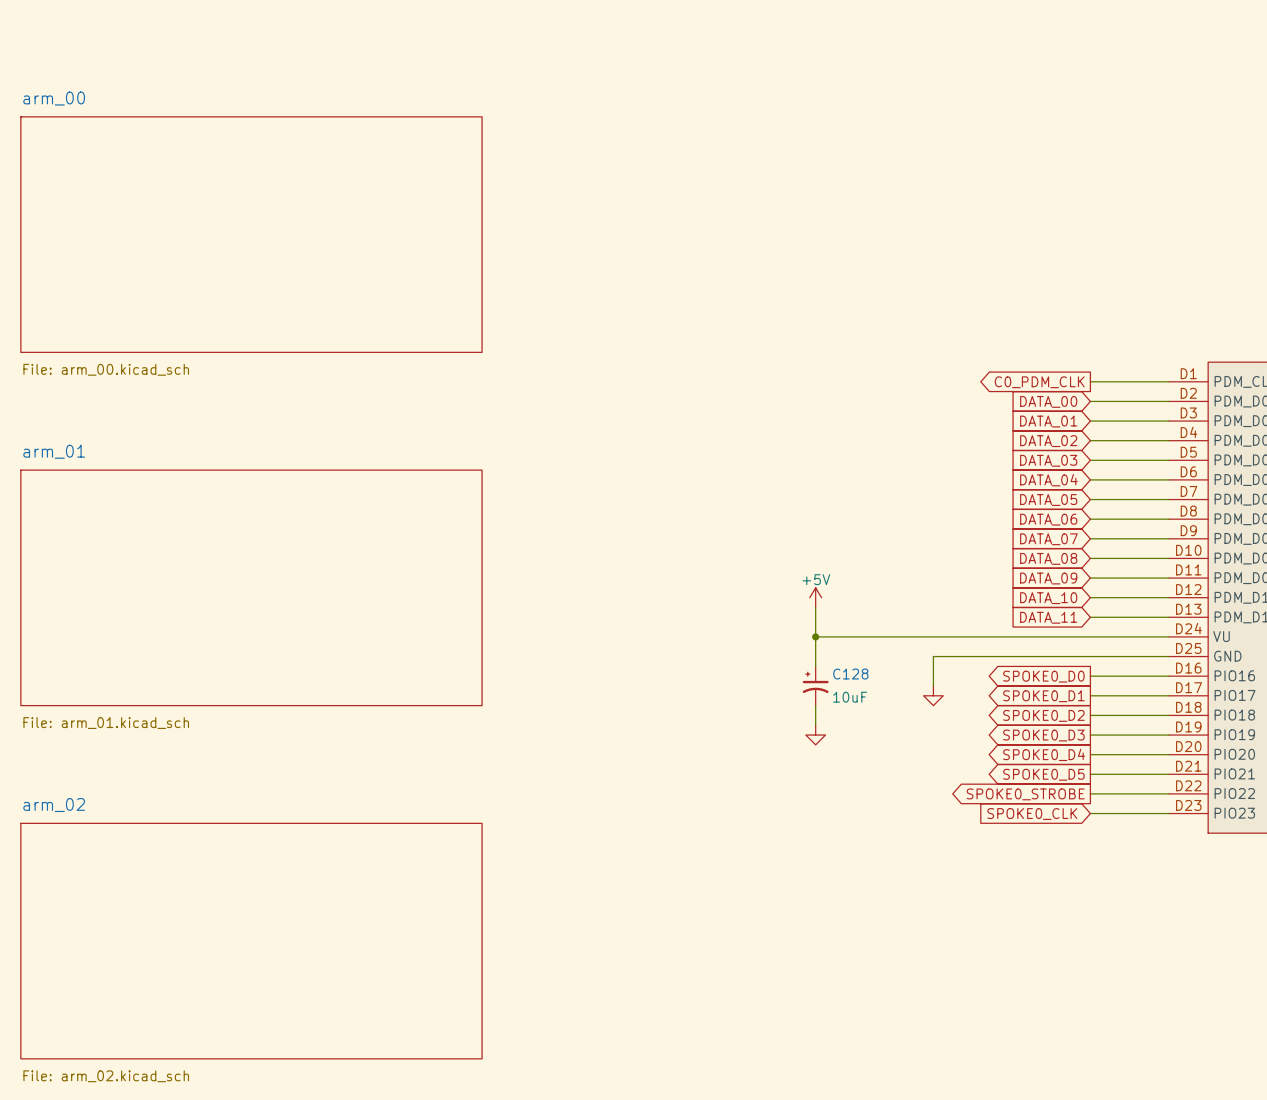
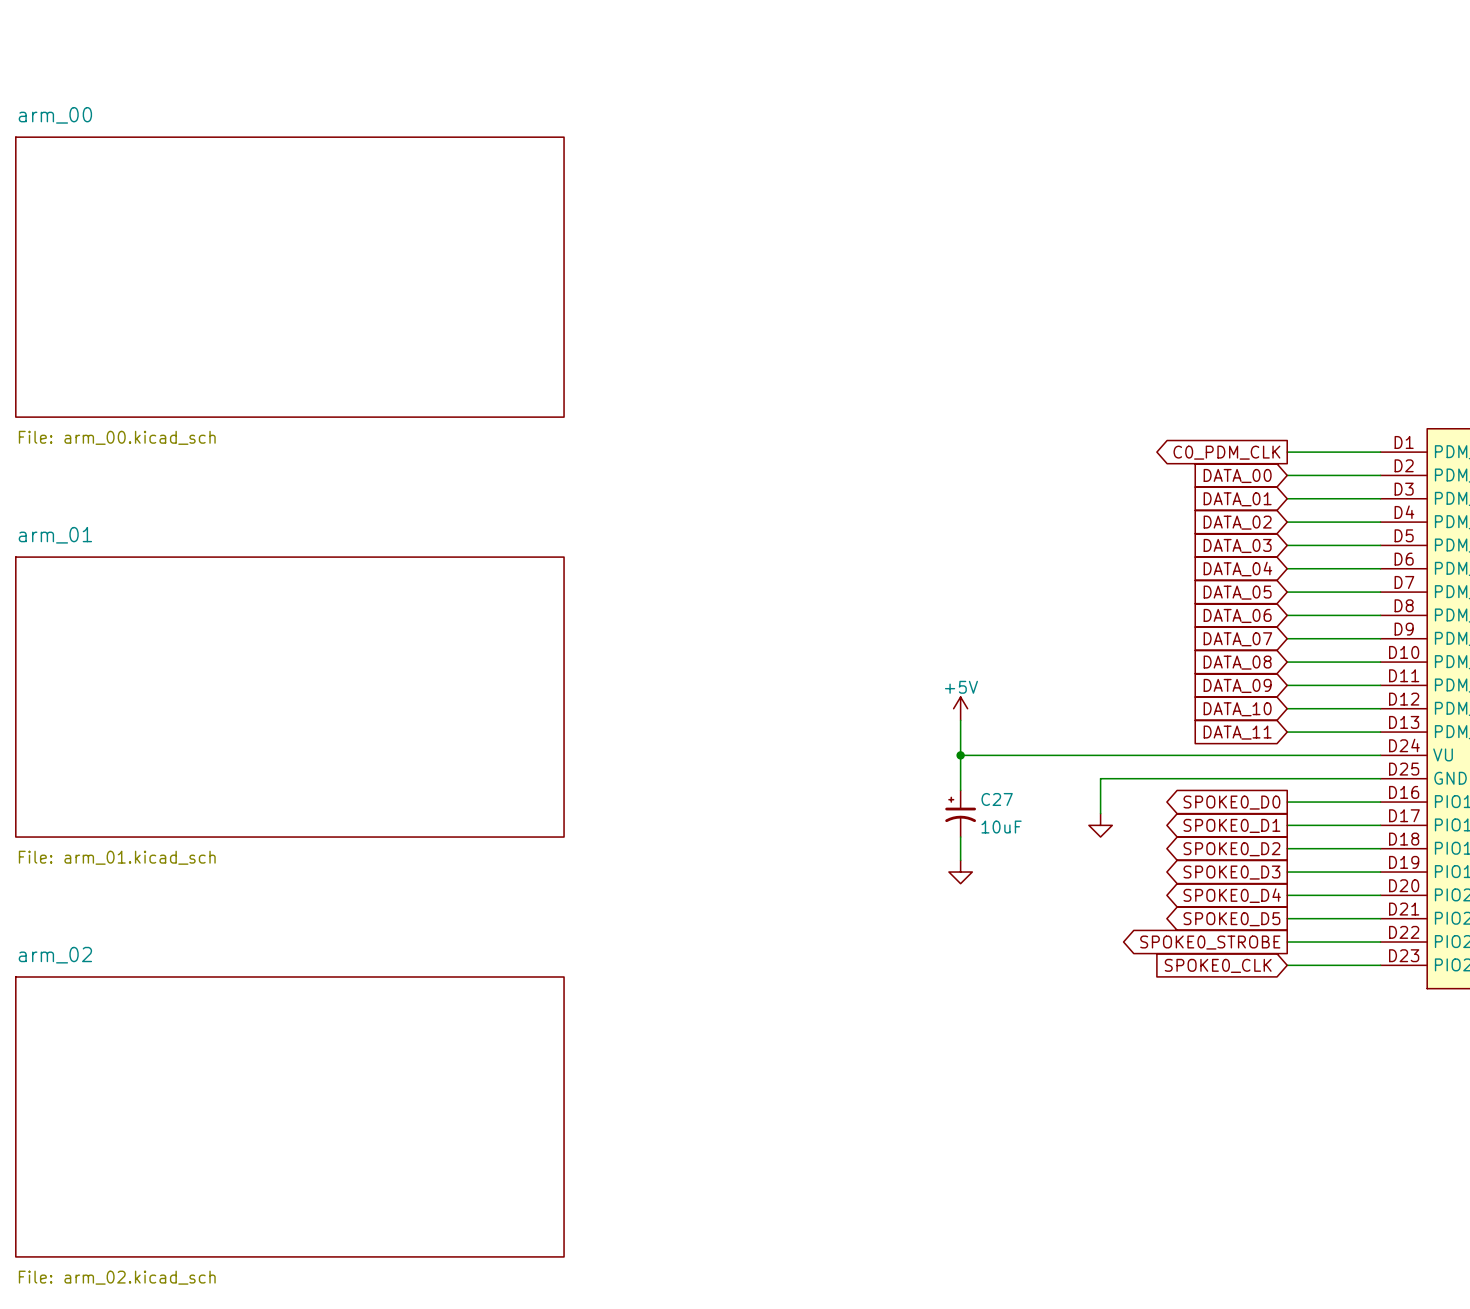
C128 name: C128 (850, 674) -> C27 (997, 799)

